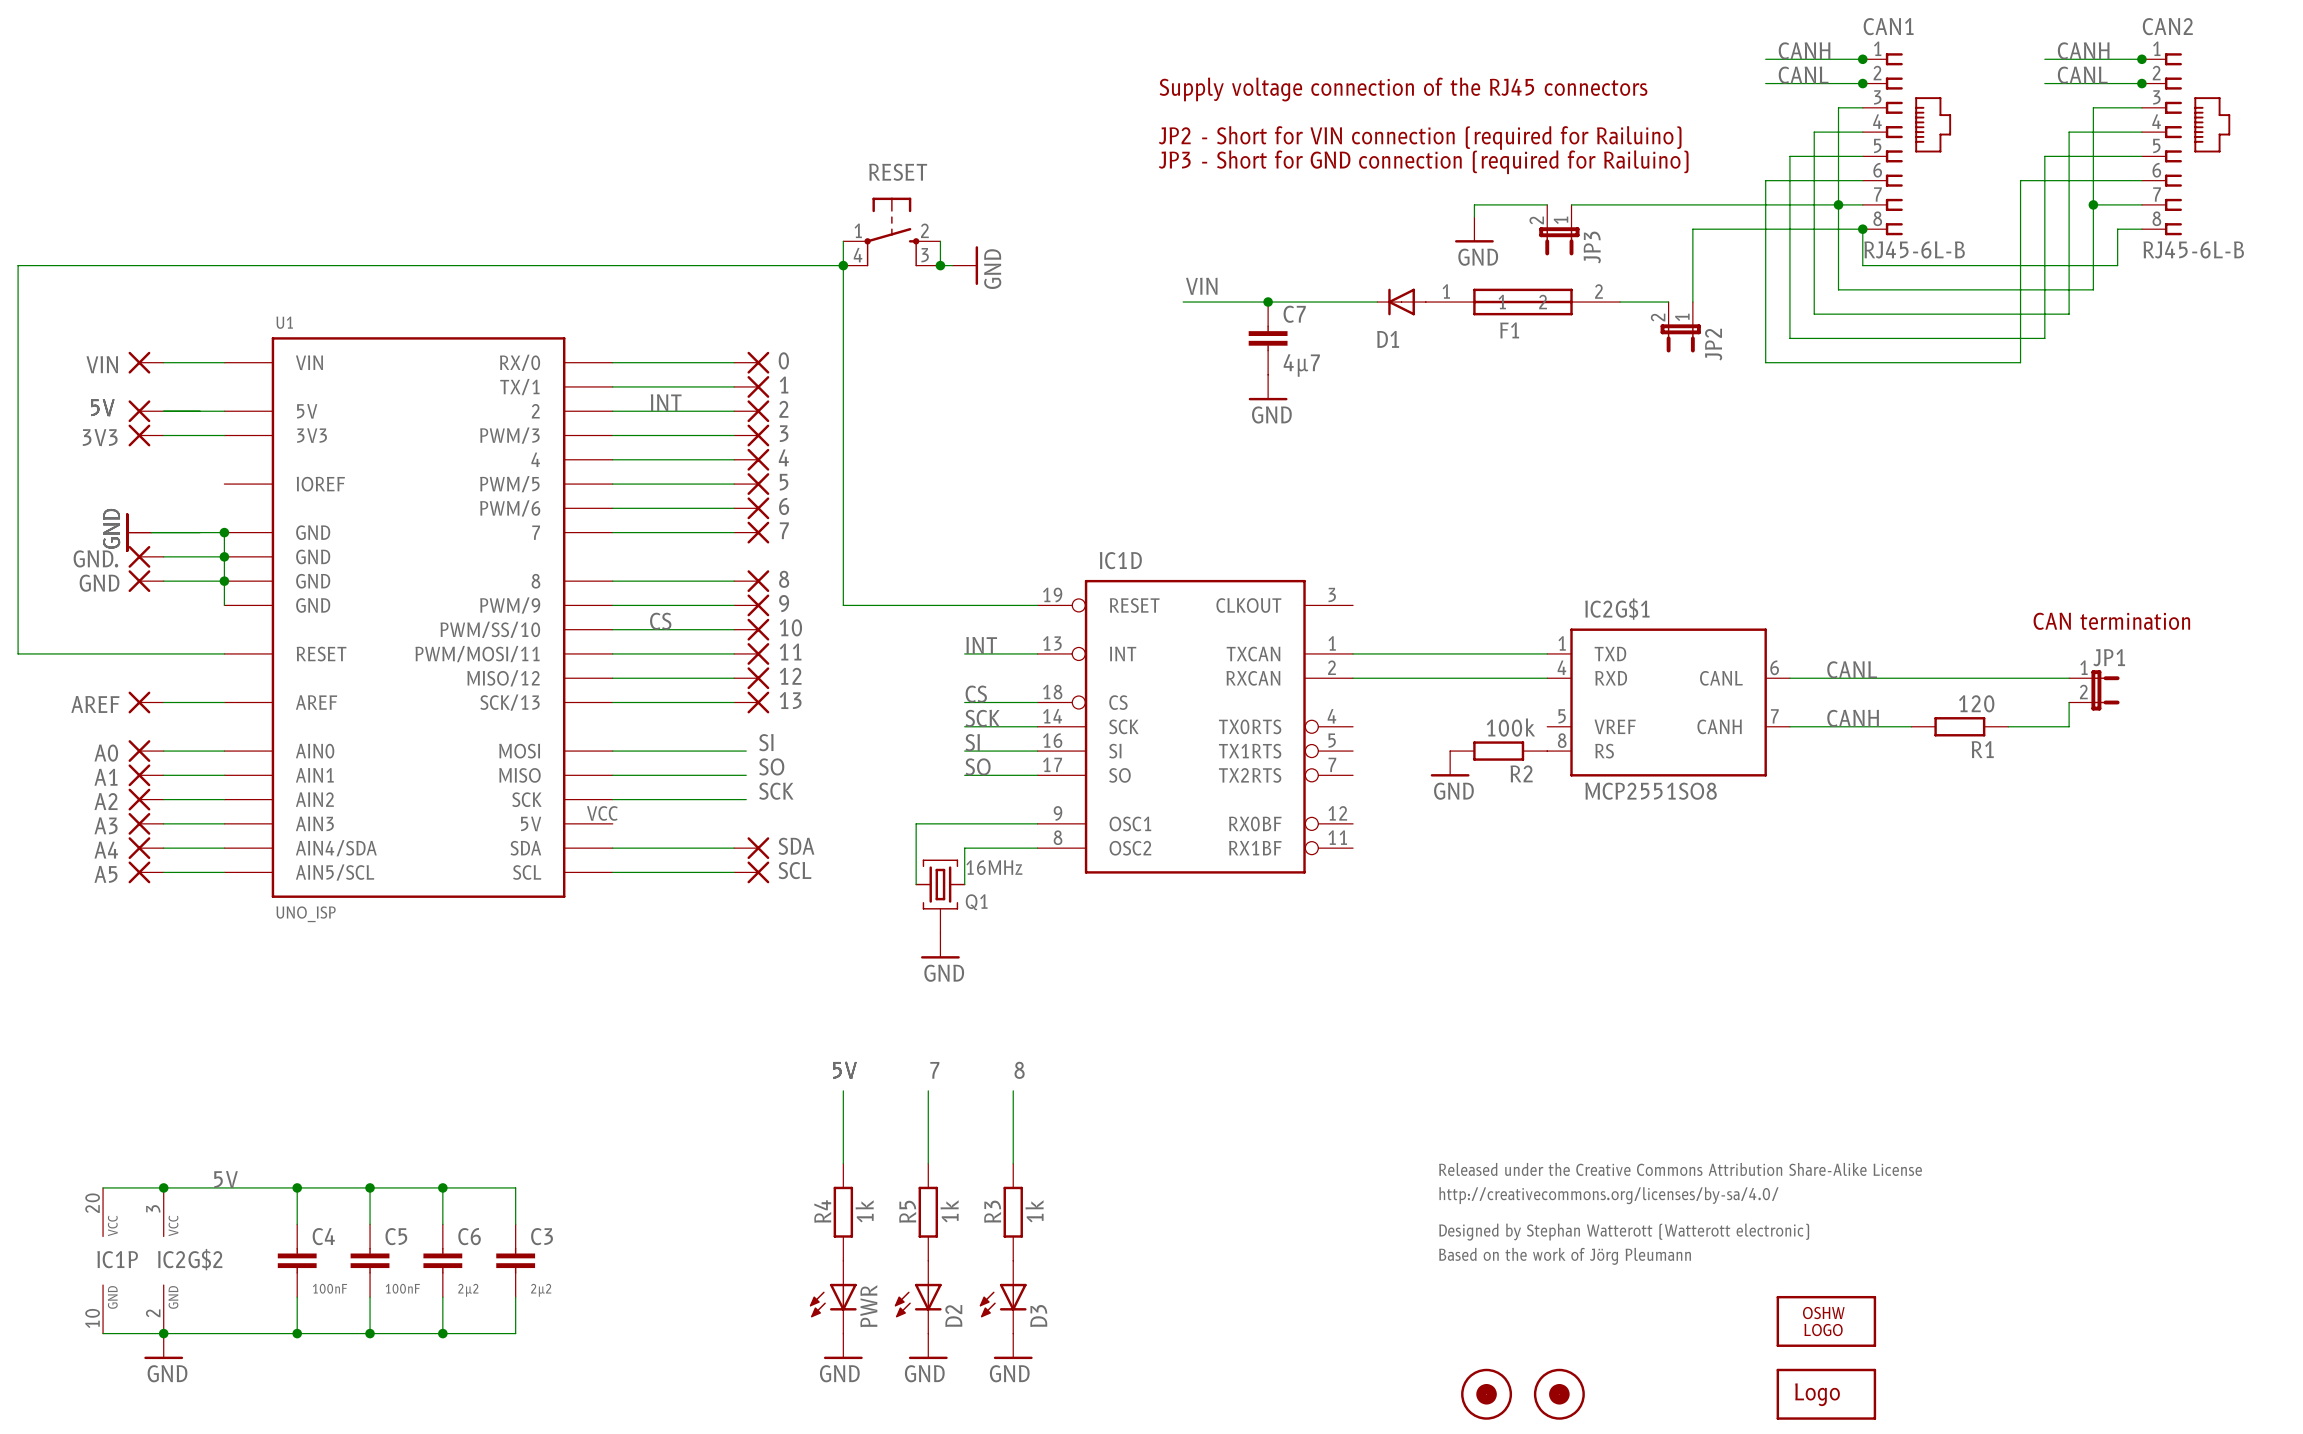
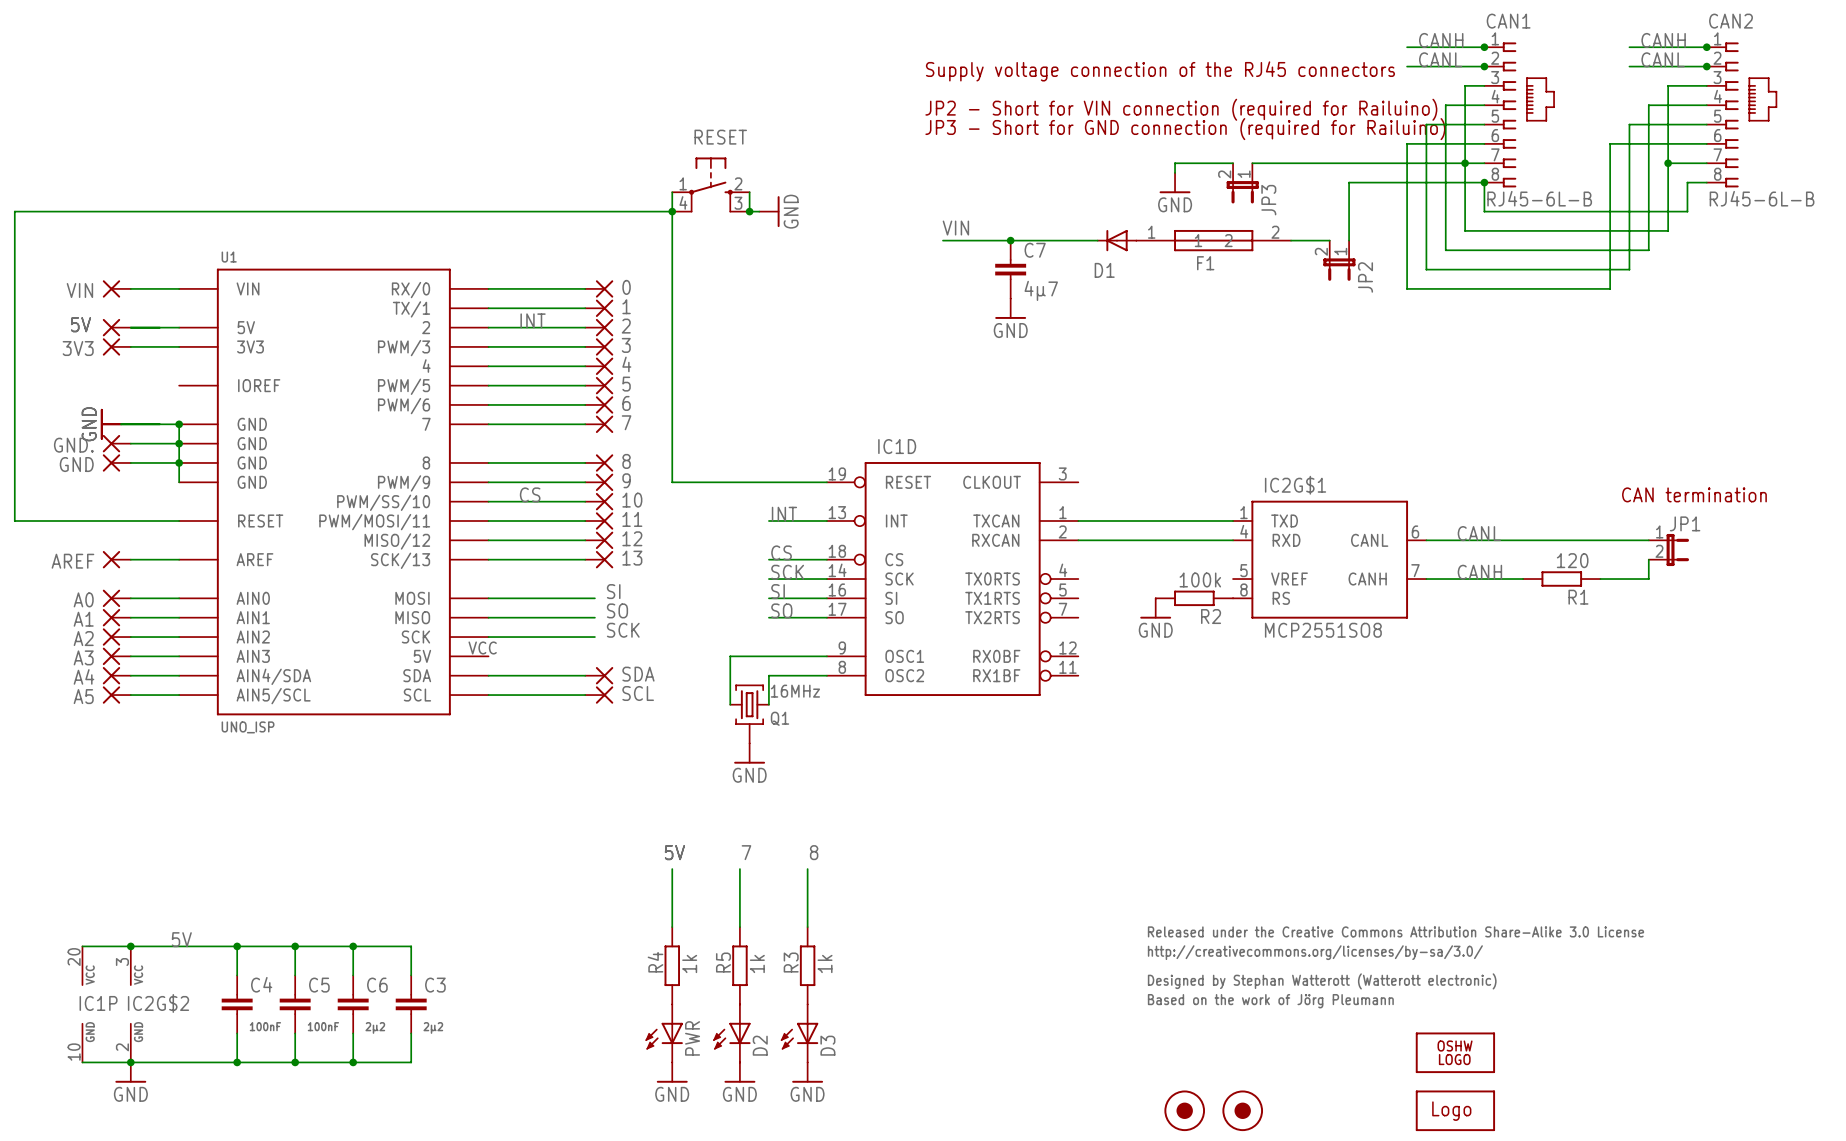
text: Released under the Creative Commons Attribution Share-Alike License (1680, 1169) -> Released under the Creative Commons Attribution Share-Alike 3.0 License (1395, 931)
text: http://creativecommons.org/licenses/by-sa/4.0/ (1608, 1195) -> http://creativecommons.org/licenses/by-sa/3.0/ (1315, 952)

